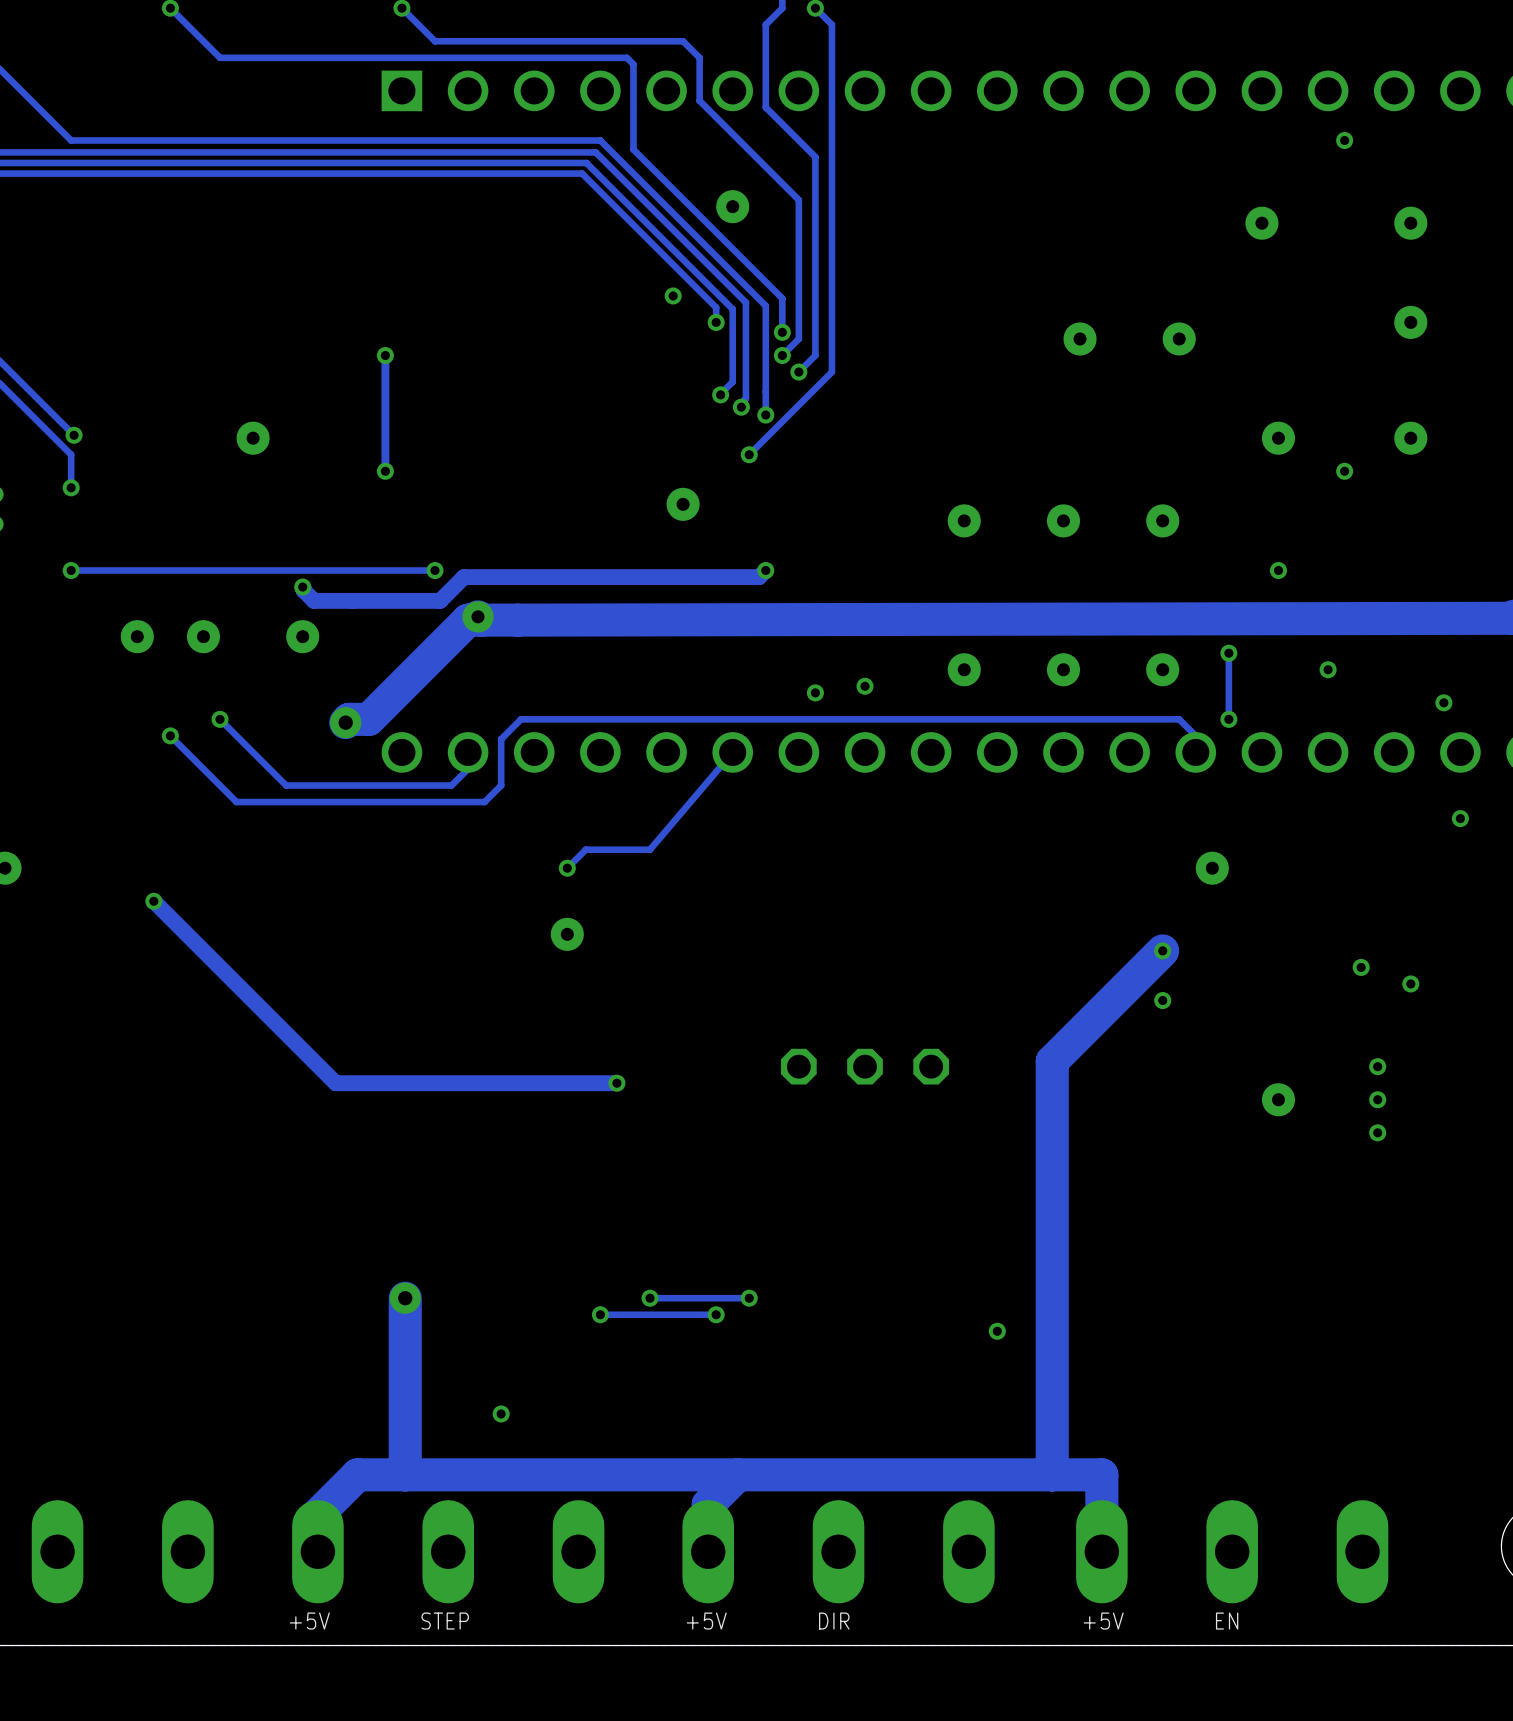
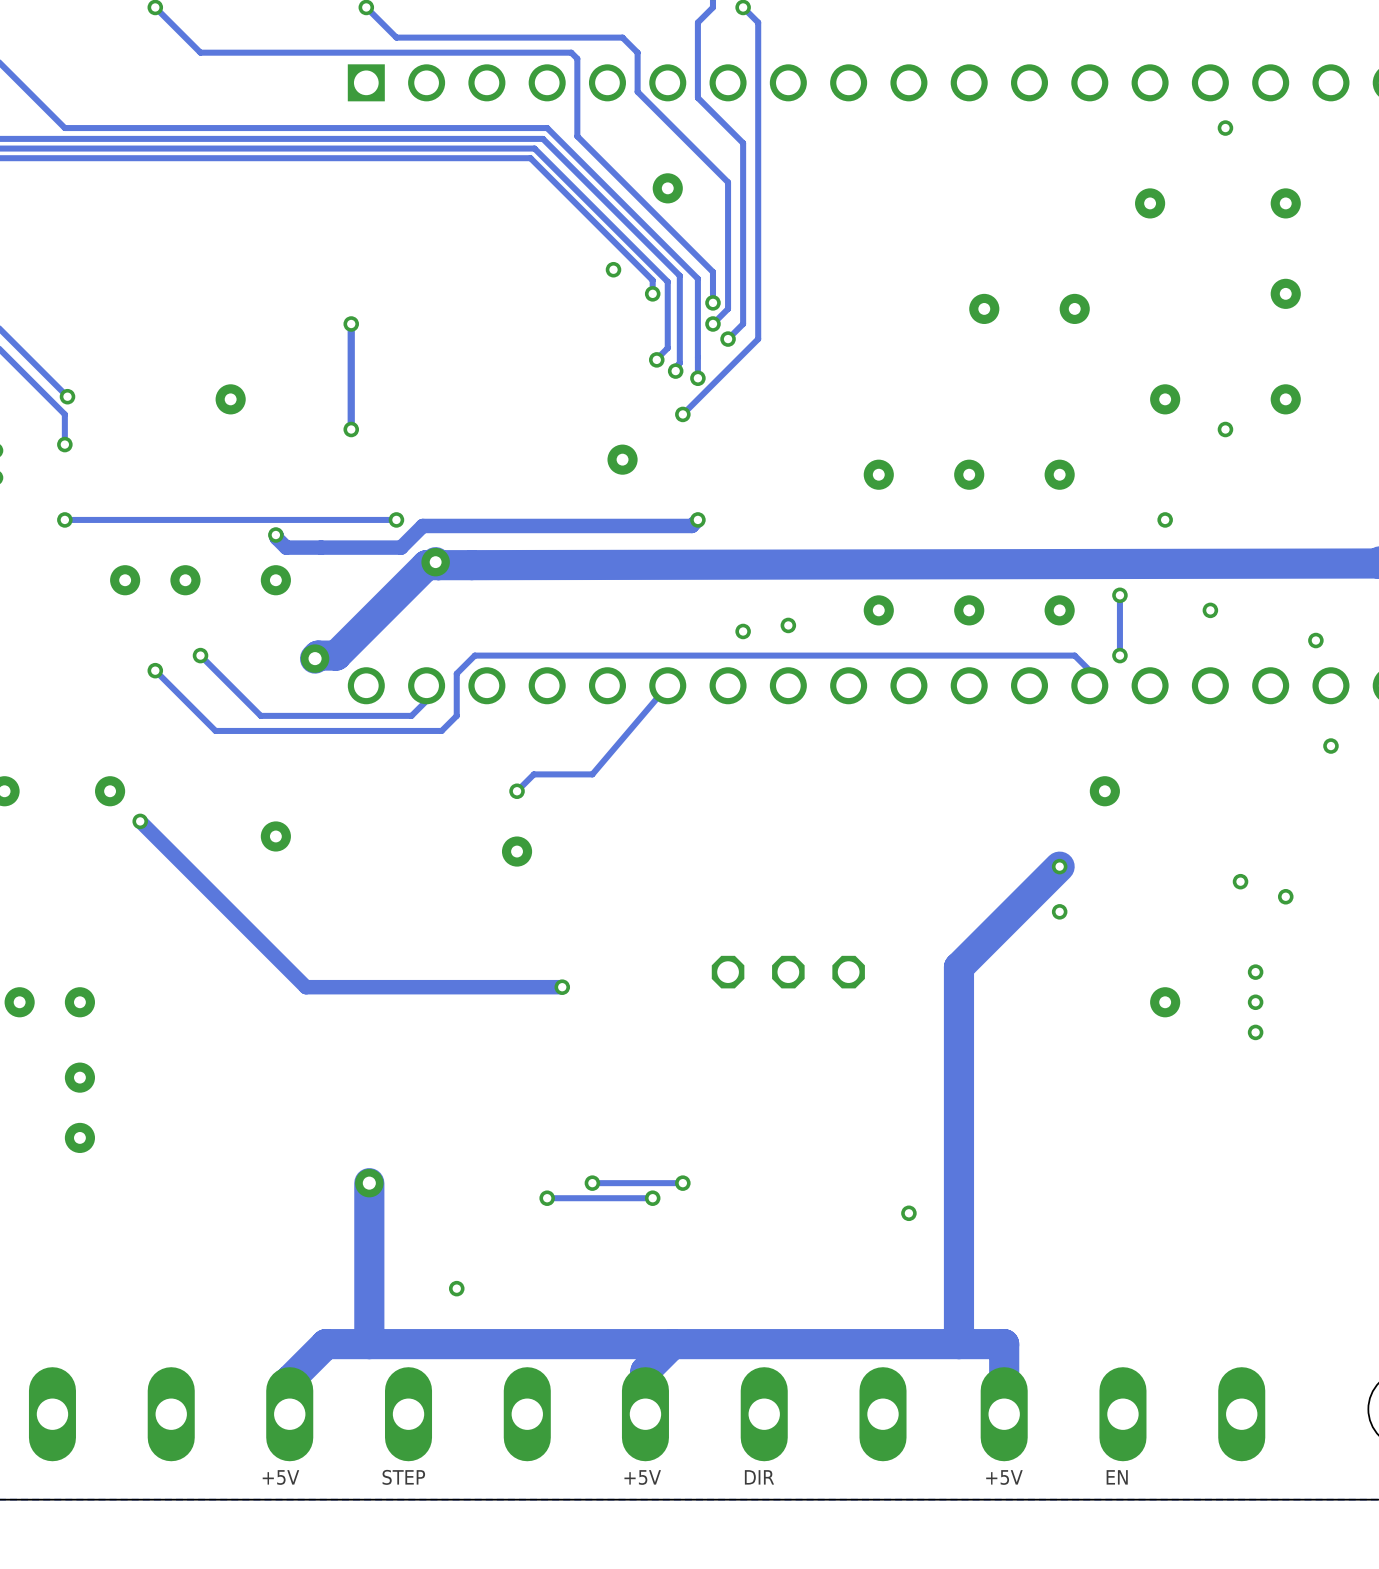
via: none -> (110, 791)
via: none -> (275, 836)
via: none -> (19, 1002)
via: none -> (79, 1002)
via: none -> (79, 1077)
via: none -> (79, 1137)

